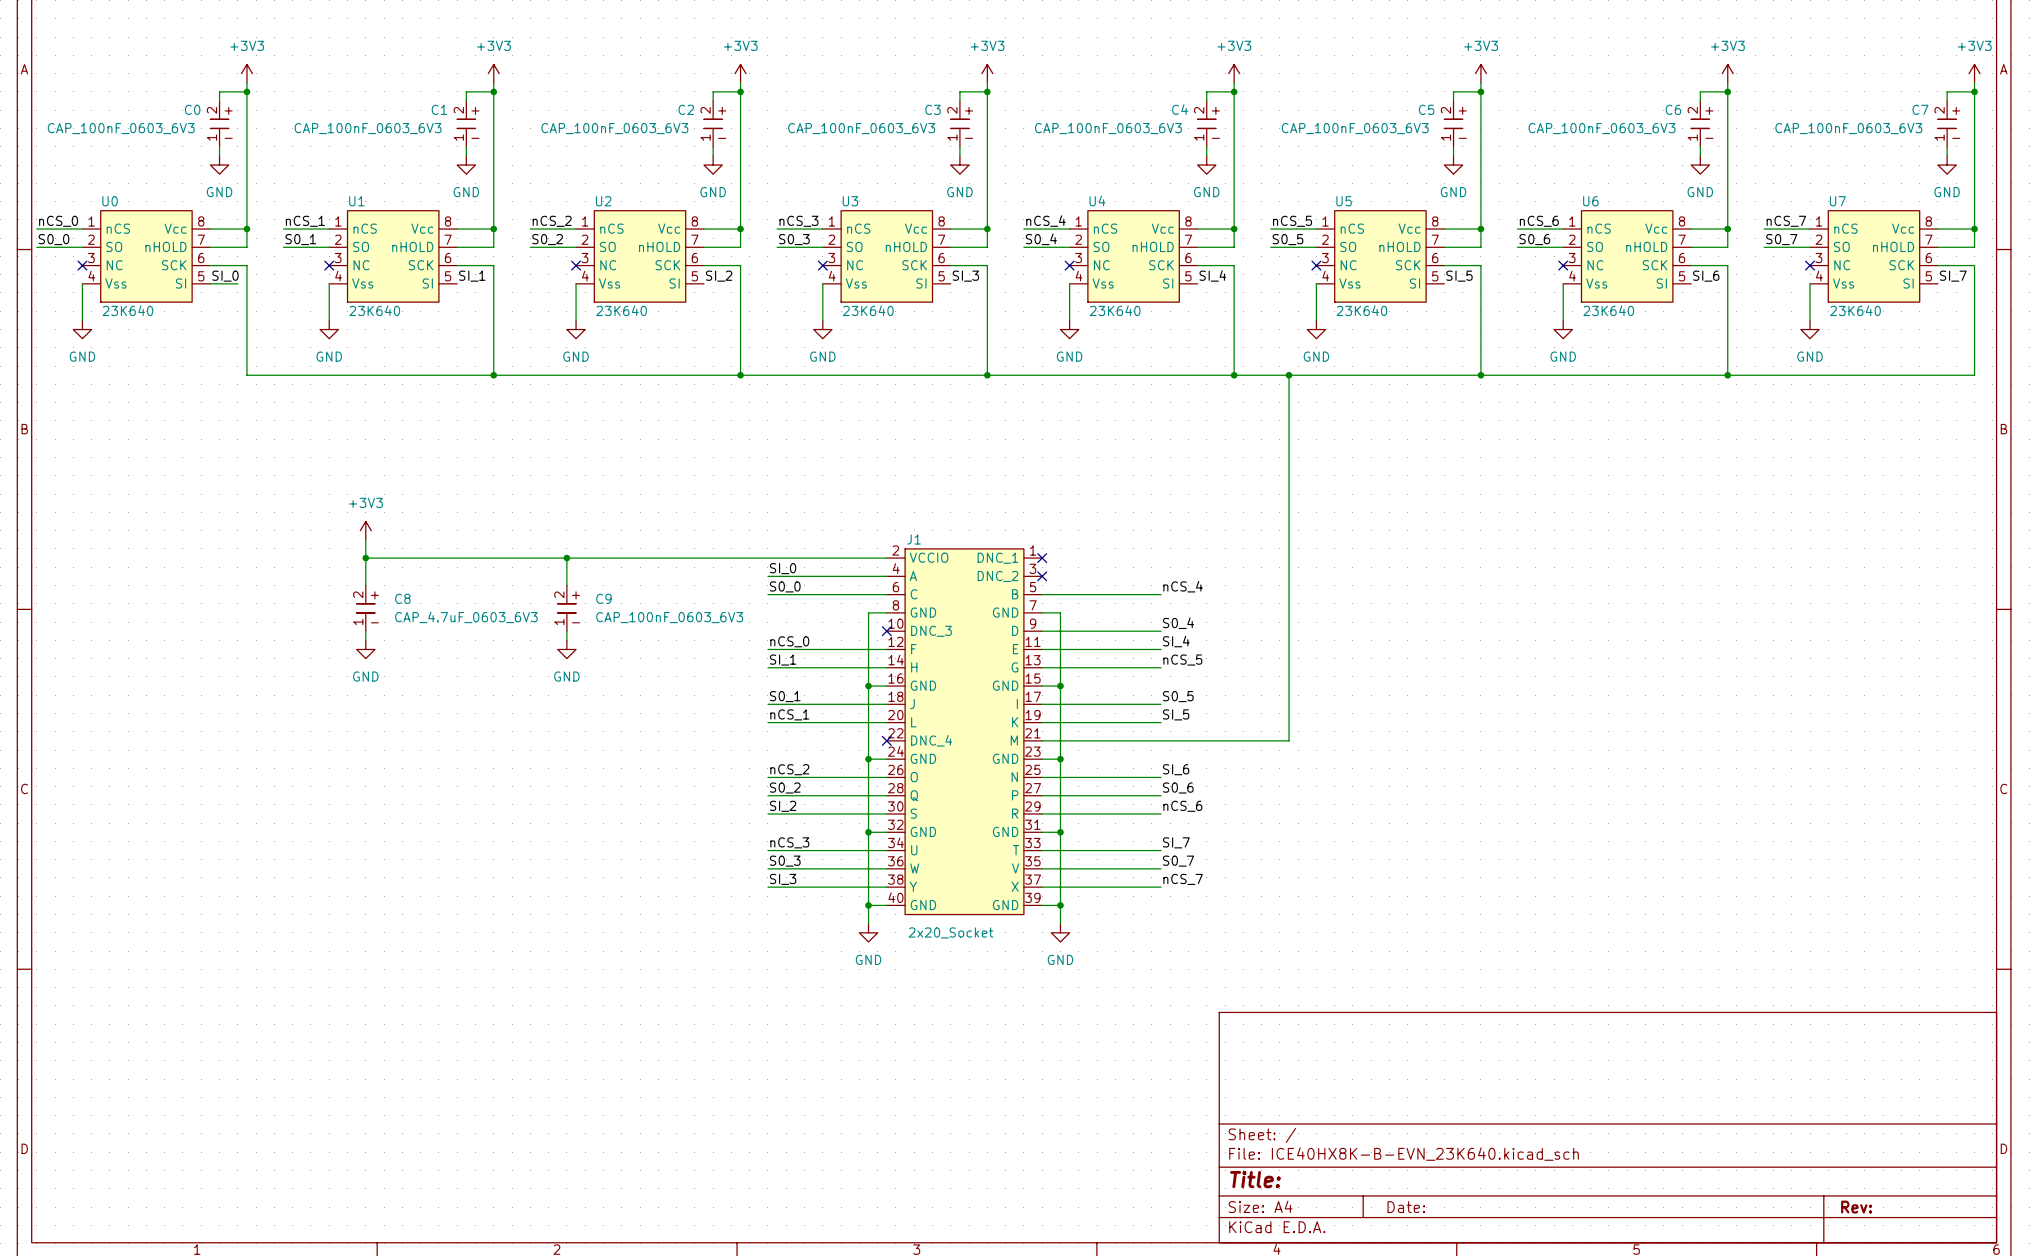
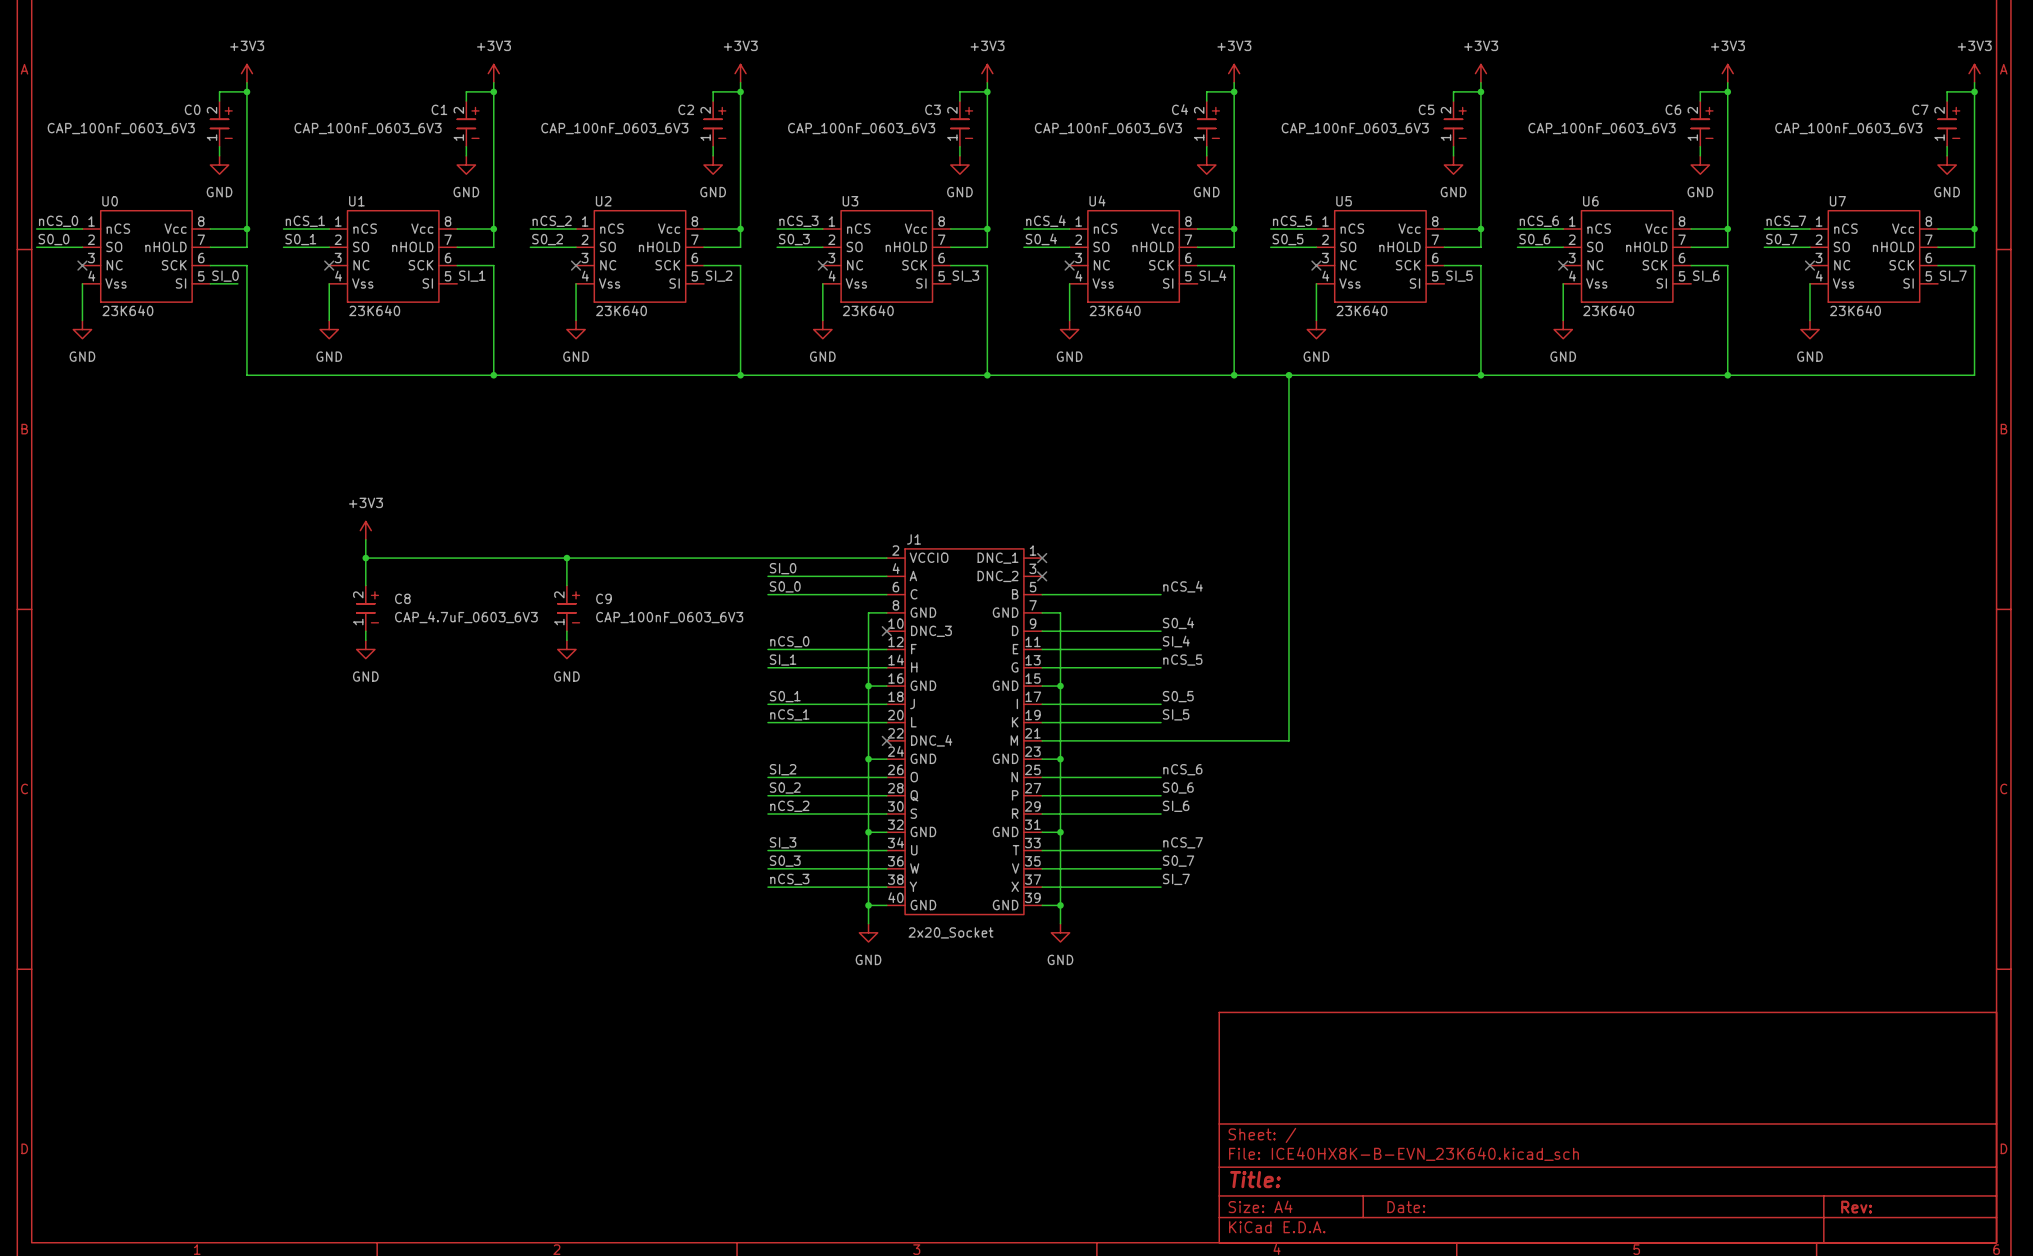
label: nCS_2 (789, 769) -> SI_2 (783, 769)
label: SI_6 (1176, 769) -> nCS_6 (1182, 769)
label: SI_2 (783, 806) -> nCS_2 (789, 806)
label: nCS_6 (1182, 806) -> SI_6 (1176, 806)
label: nCS_3 (789, 842) -> SI_3 (783, 842)
label: SI_7 (1176, 842) -> nCS_7 (1183, 842)
label: SI_3 (783, 879) -> nCS_3 (789, 879)
label: nCS_7 (1183, 879) -> SI_7 (1176, 879)

